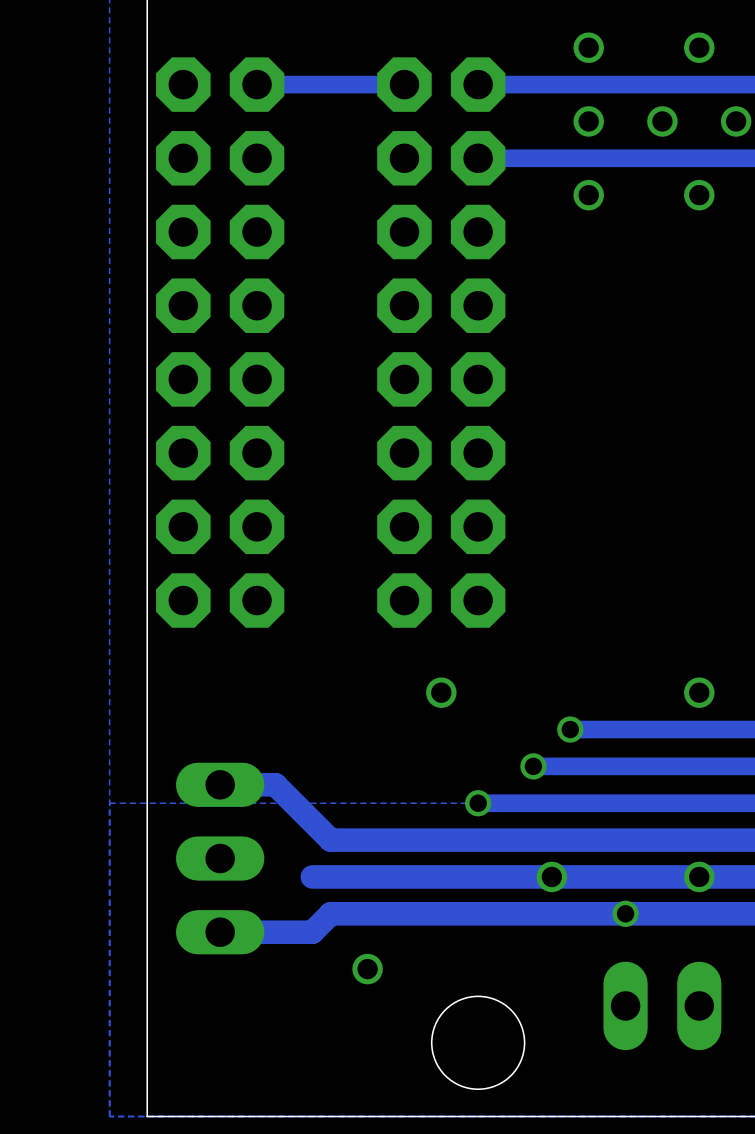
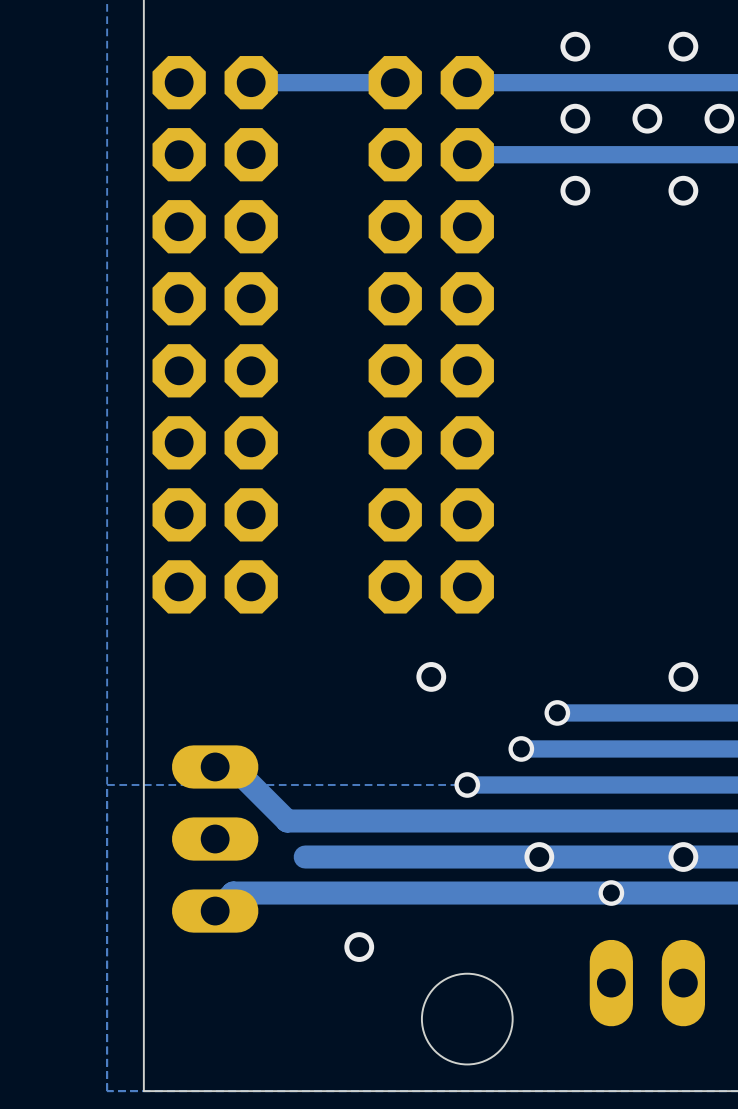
track: (238, 784) (275, 784) (330, 840) -> (233, 766) (287, 821) (323, 821)
track: (330, 913) (312, 932) (220, 932) -> (323, 893) (233, 893) (215, 911)

